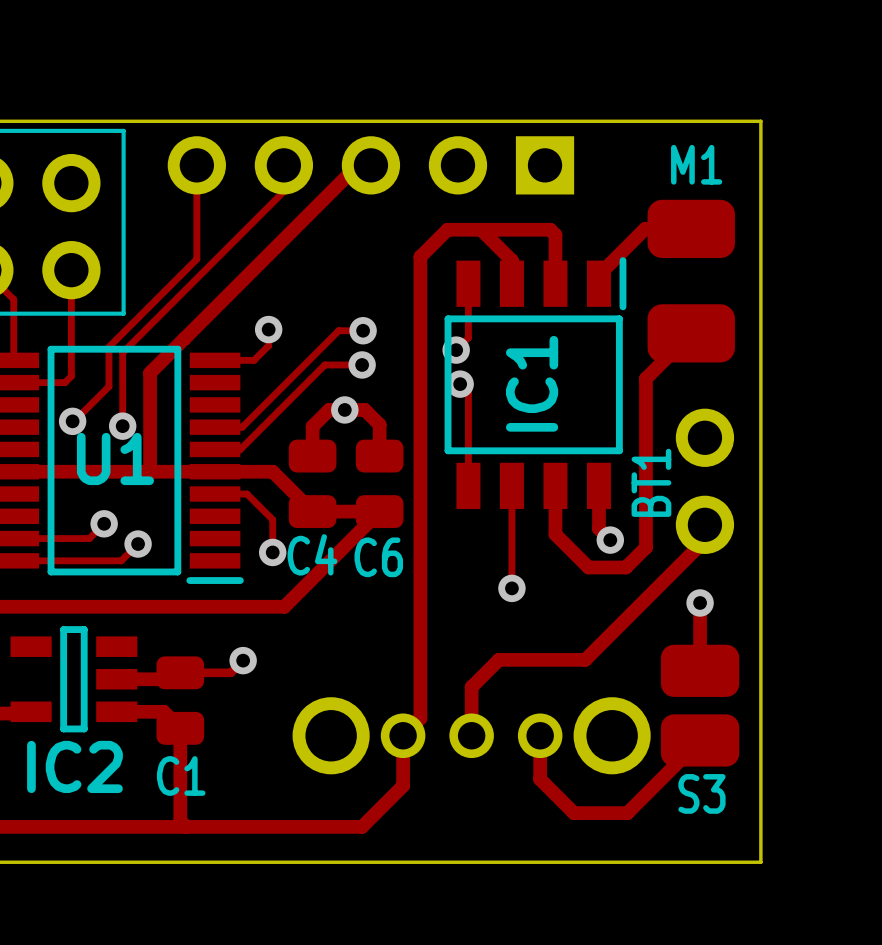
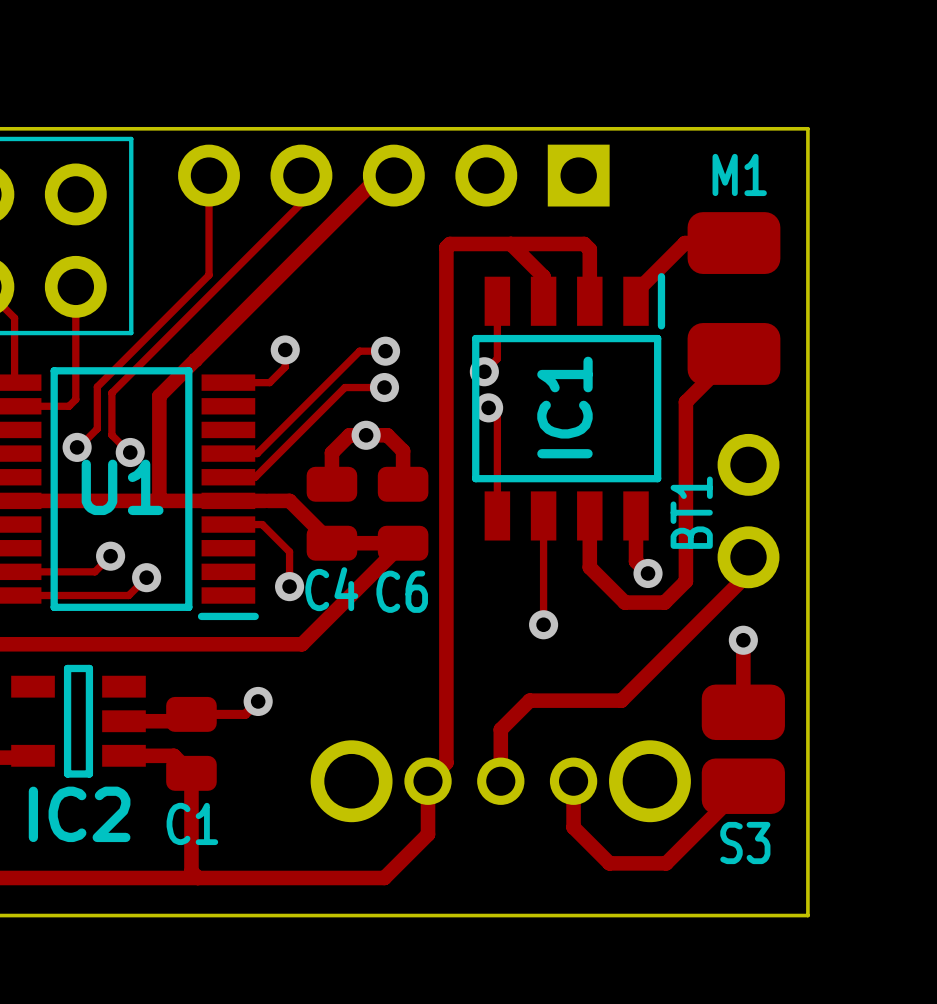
track: (447, 229) (420, 256) -> (475, 243) (449, 243) (446, 247) (446, 272)
track: (108, 347) (108, 386) (91, 403) -> (115, 368) (97, 386) (97, 428)
track: (122, 352) (122, 426) -> (130, 374) (111, 392) (111, 435) (130, 452)

